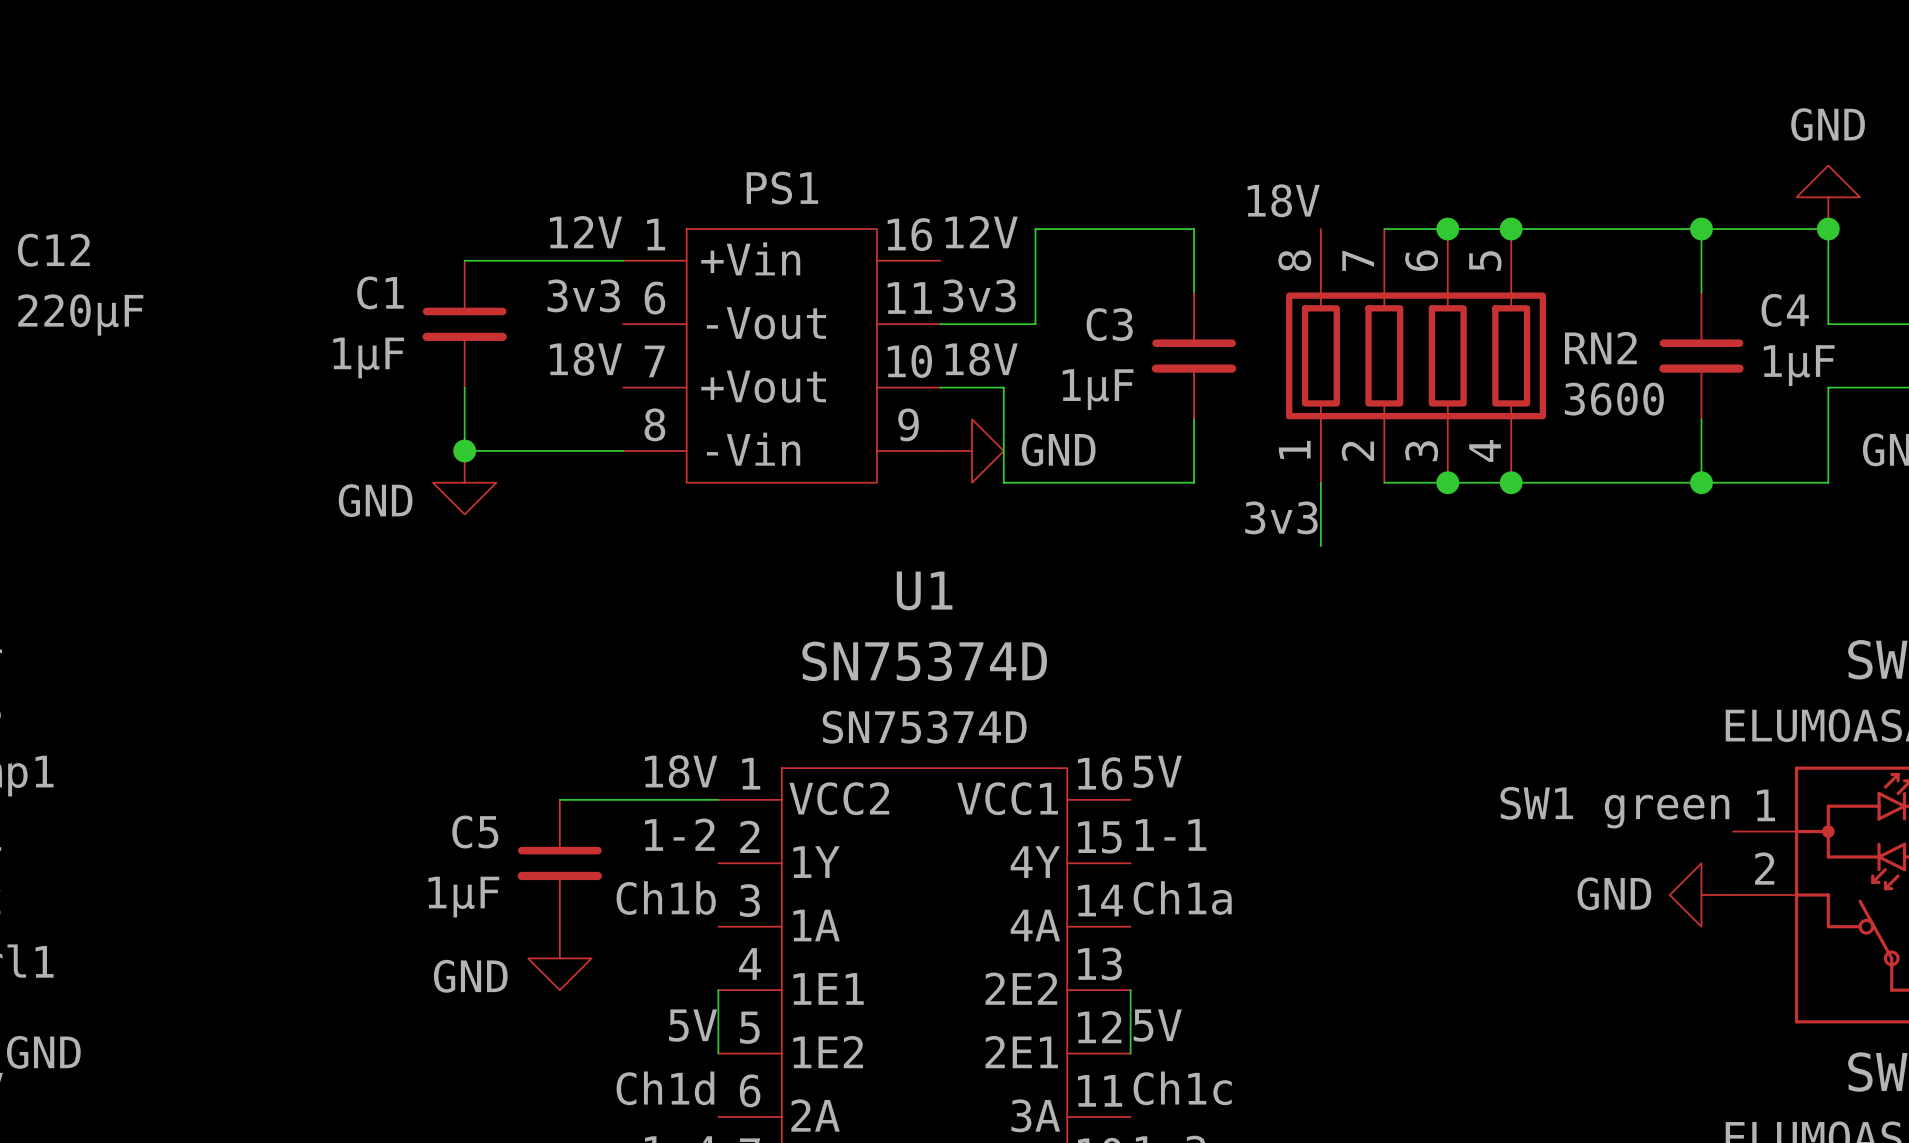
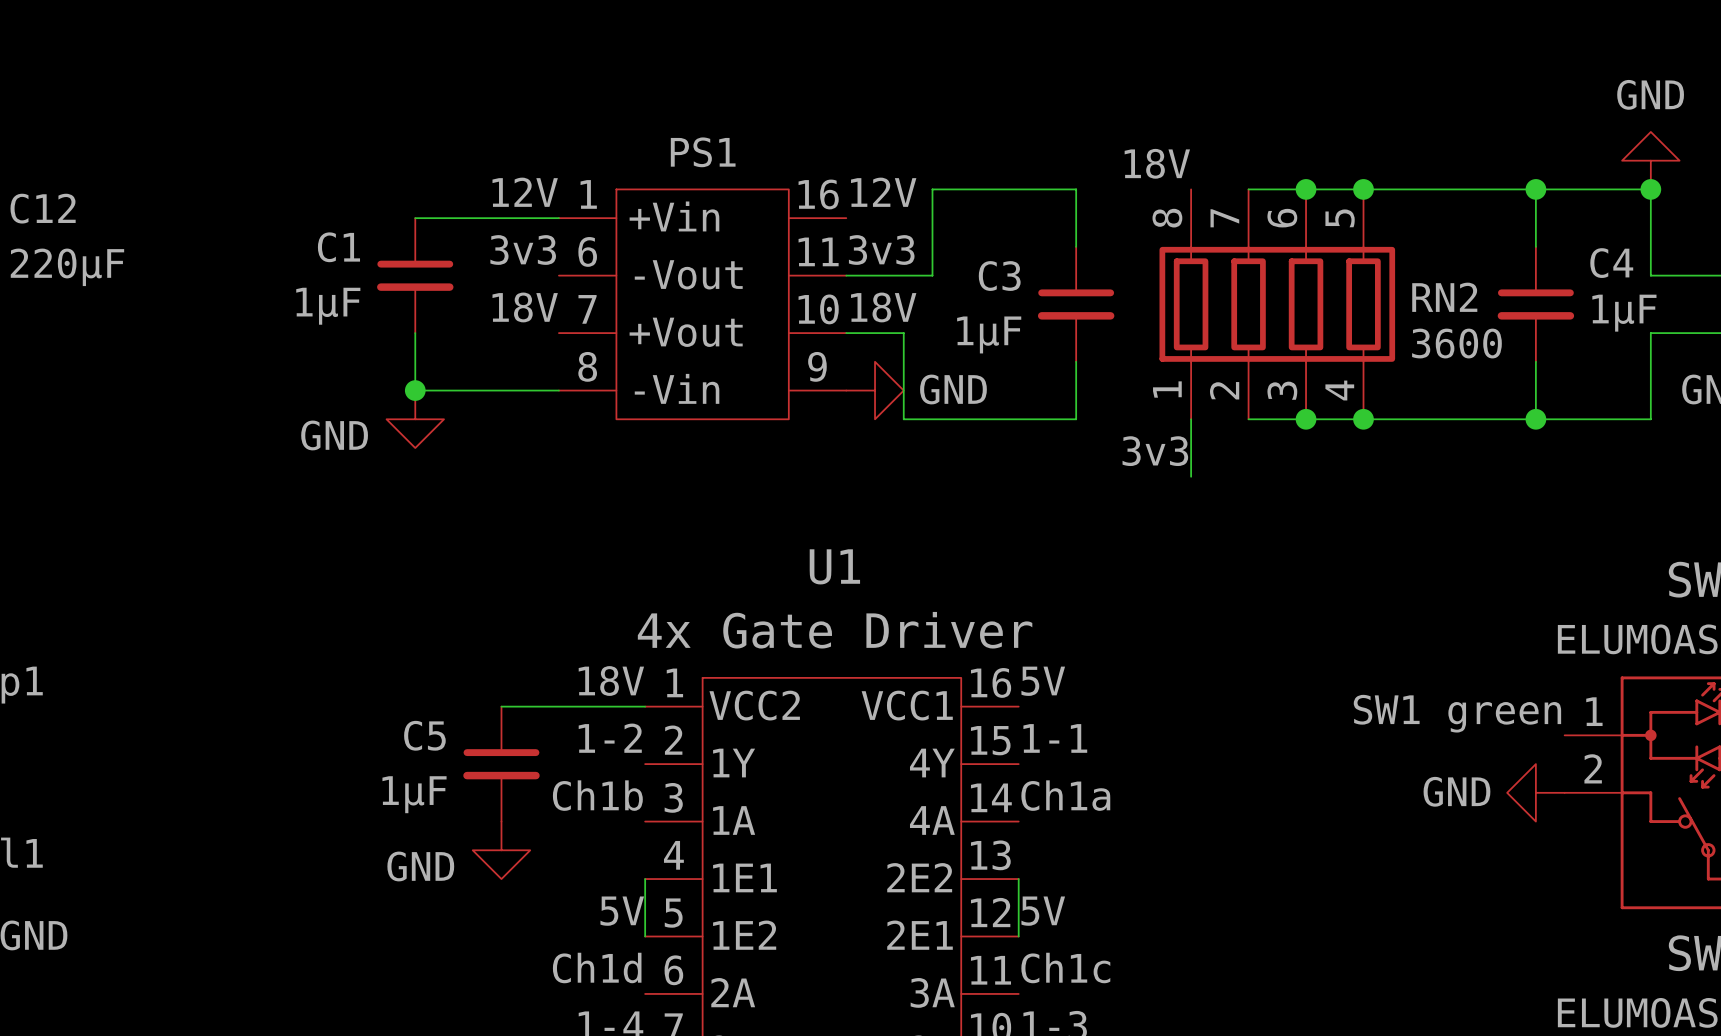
U1 name position: U1 (924, 590) -> U1 (834, 566)
U1 value: SN75374D (924, 661) -> 4x Gate Driver (835, 630)
U1 text: SN75374D (924, 727) -> none

